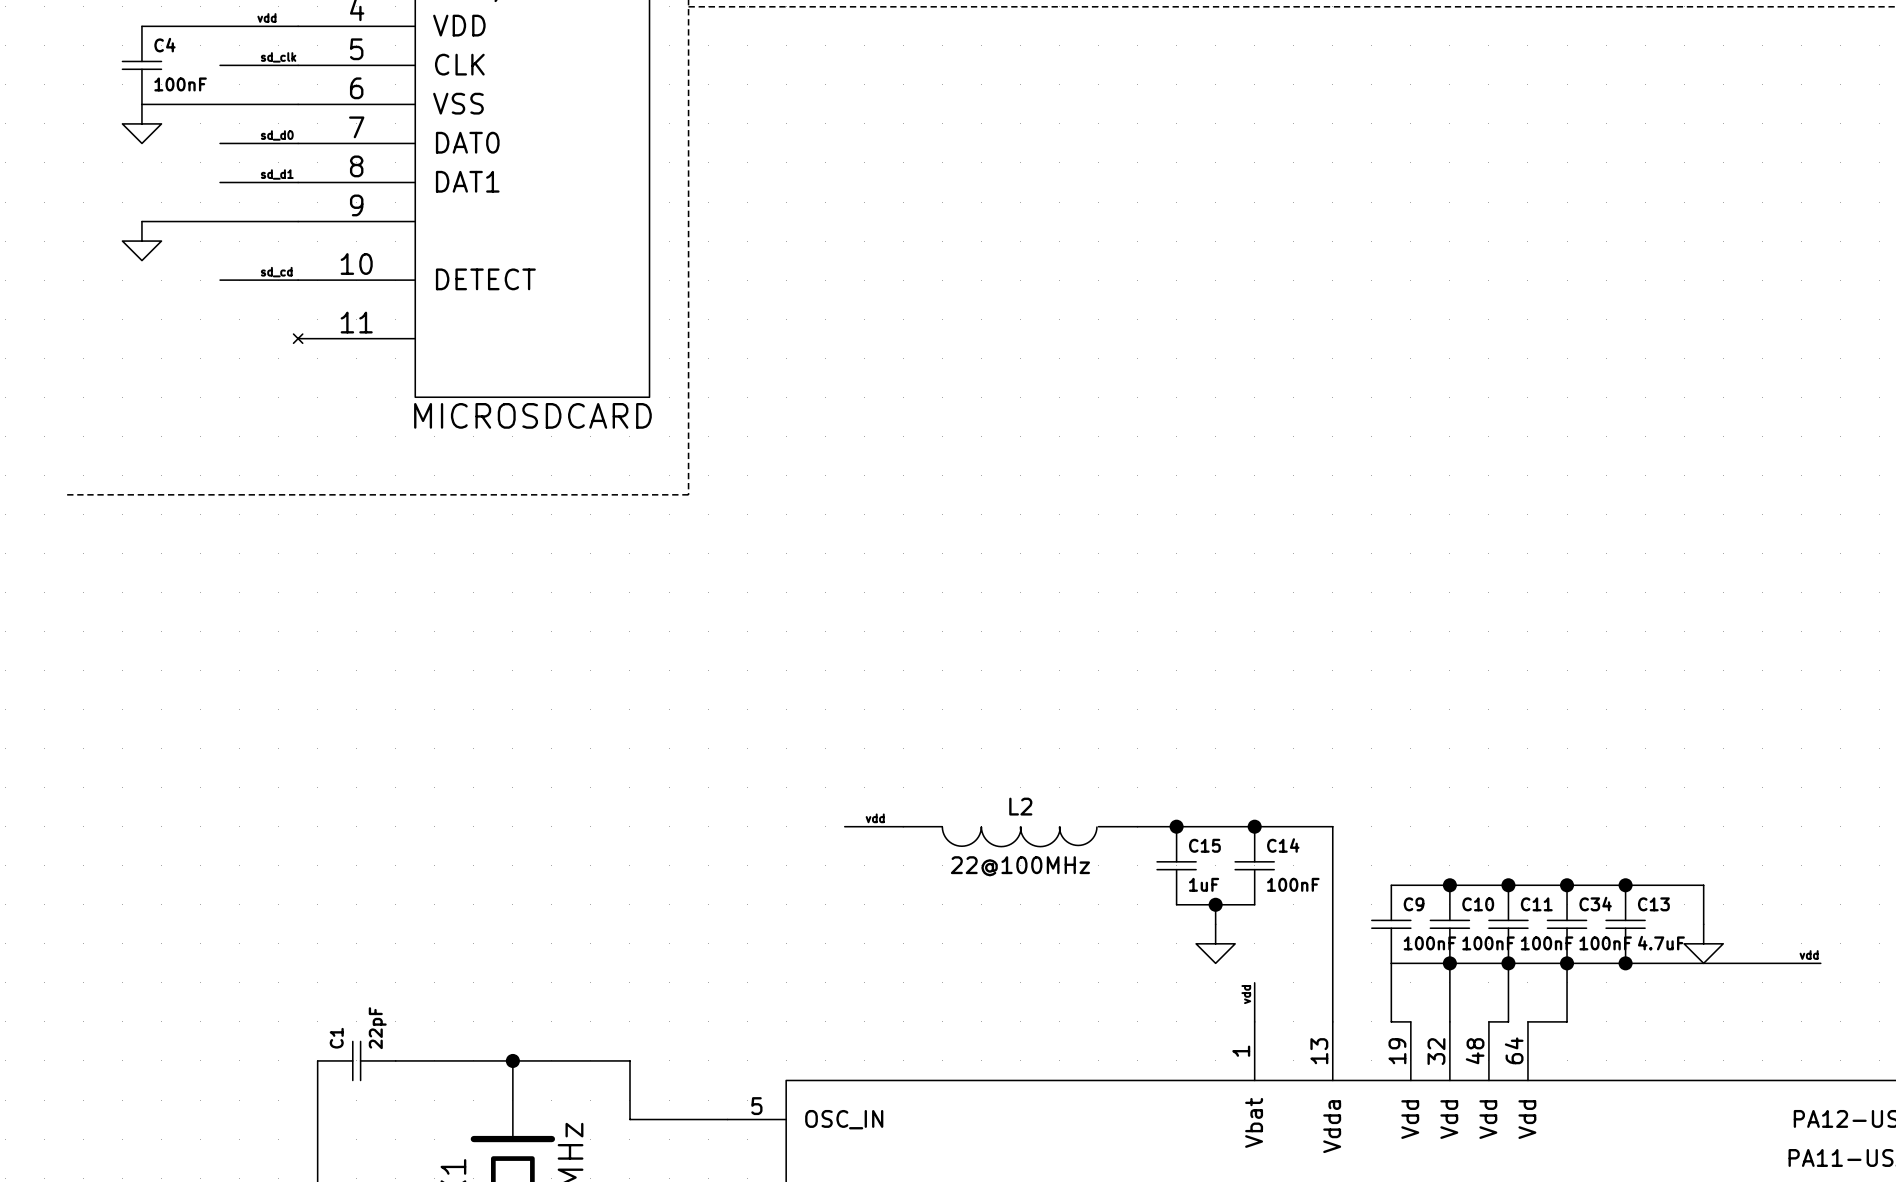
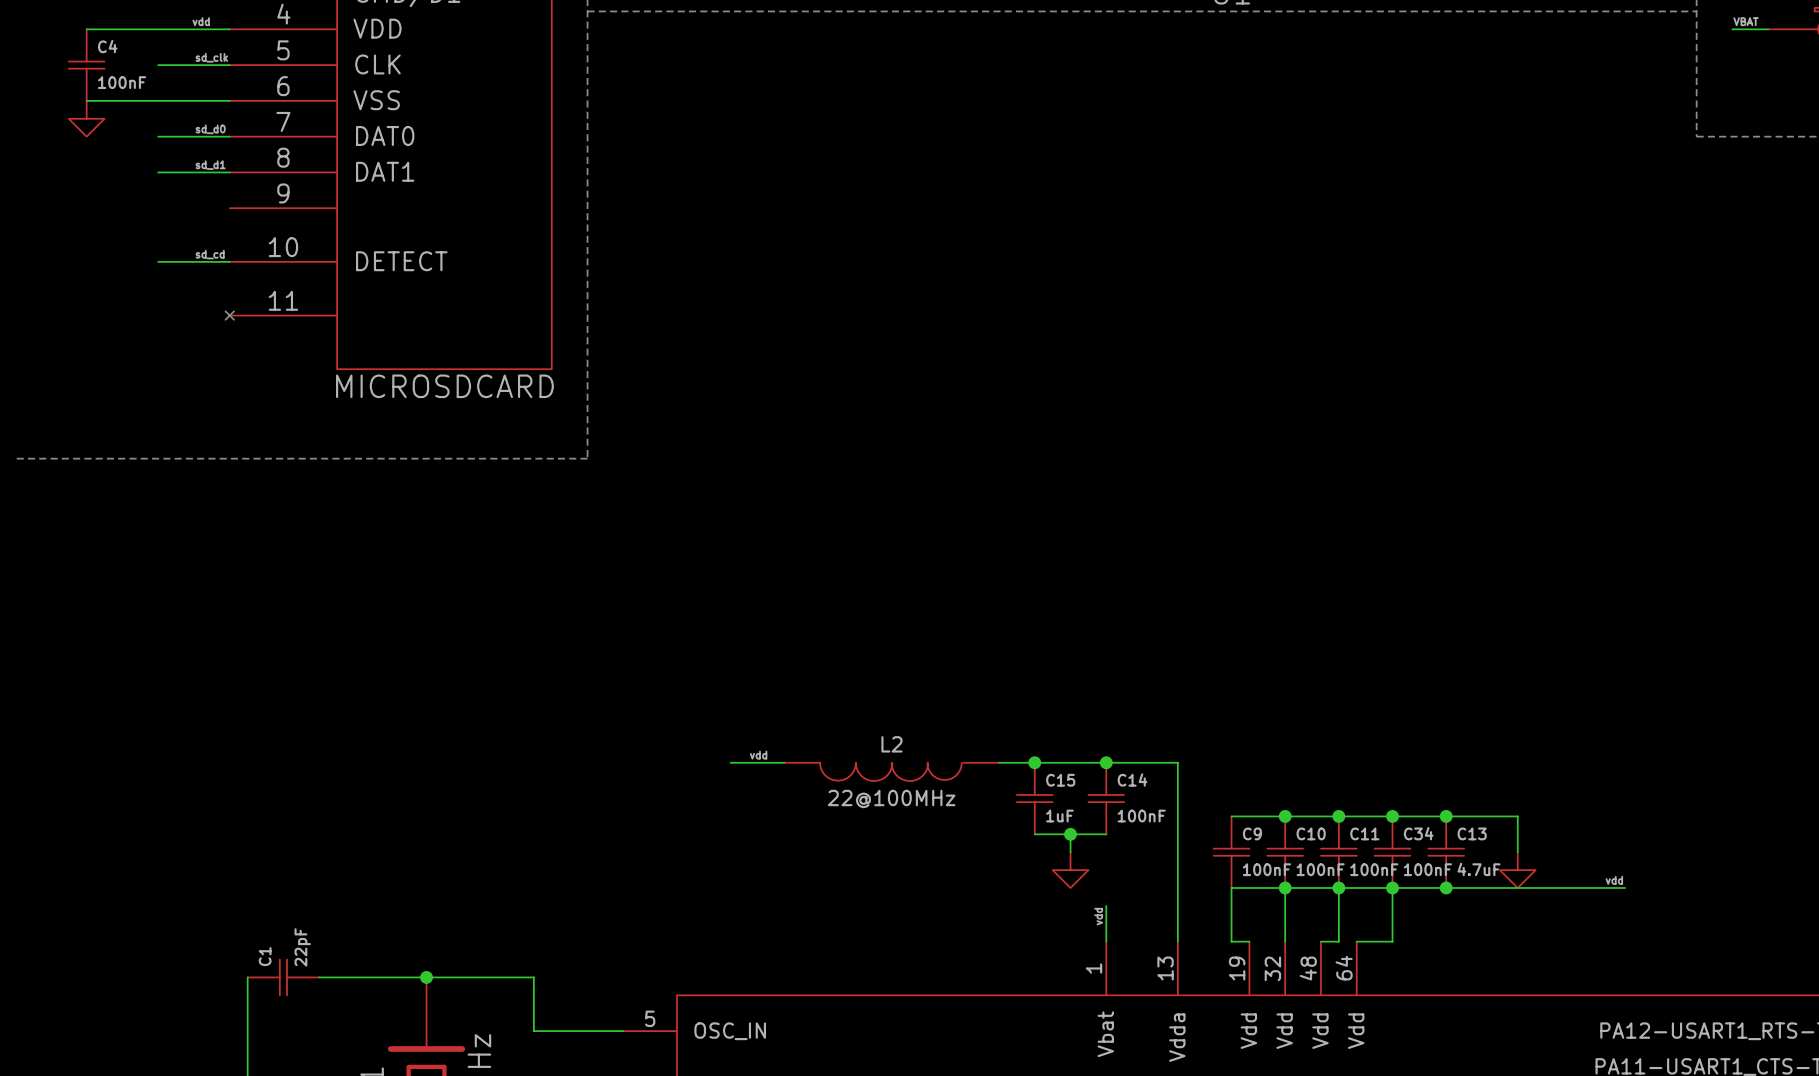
wire: (141, 221) (298, 221) -> none
power symbol: (141, 241) -> none

